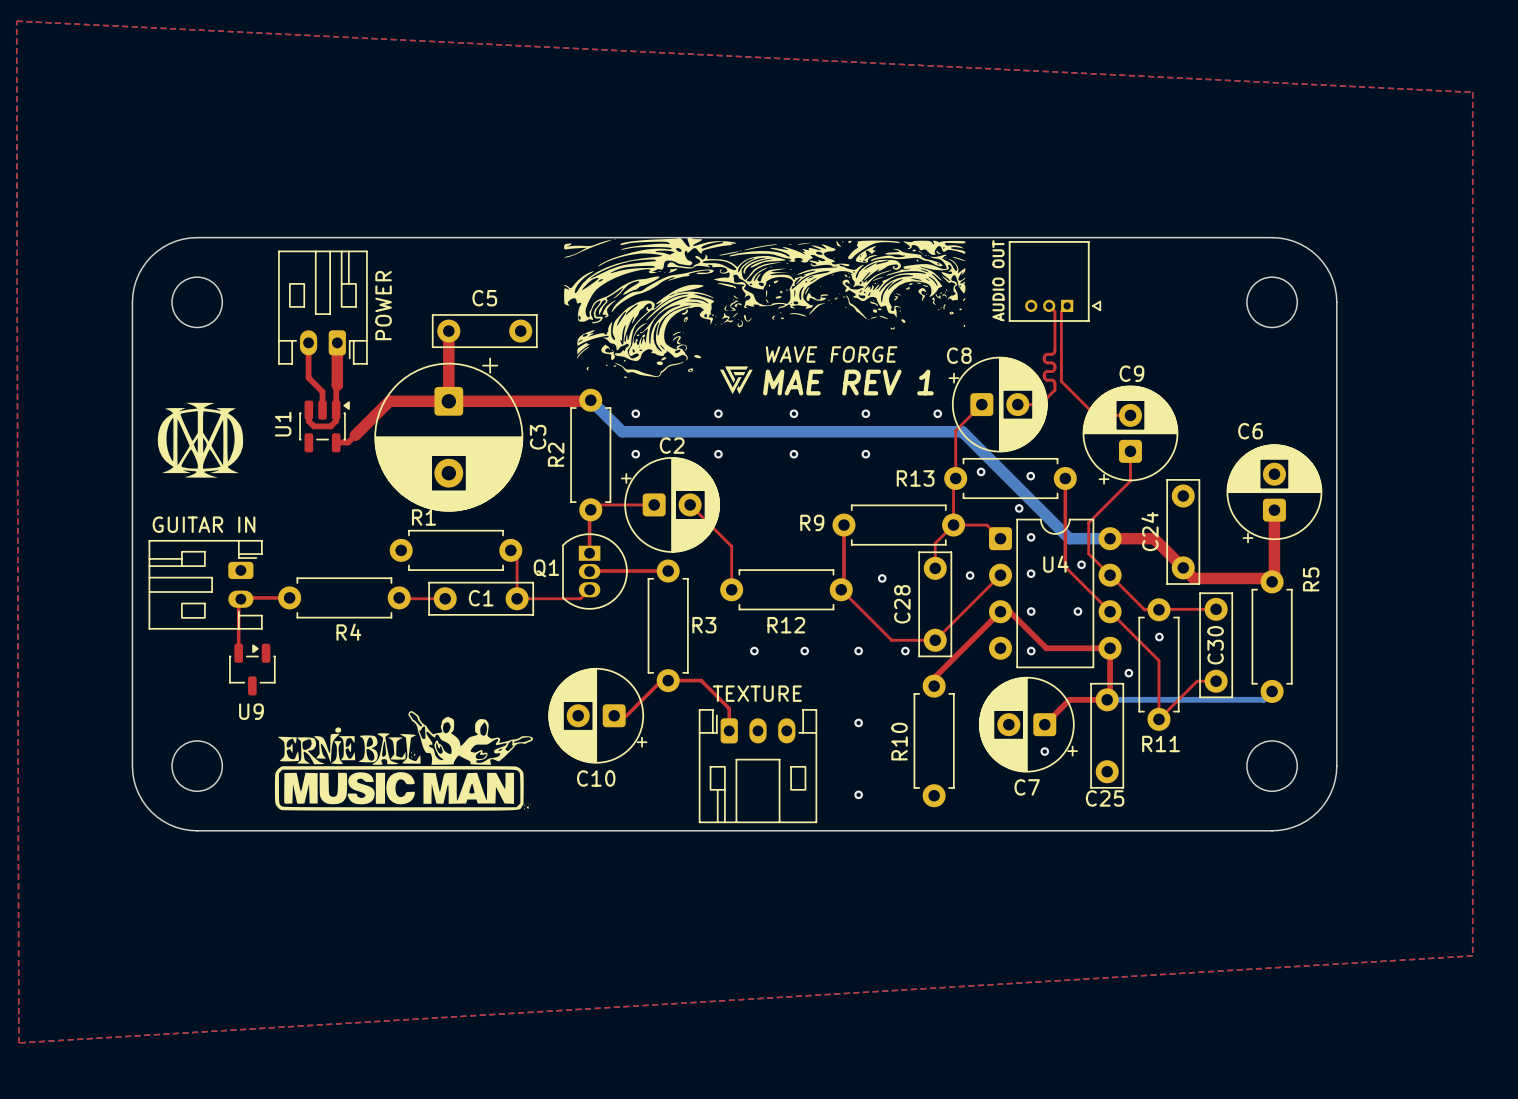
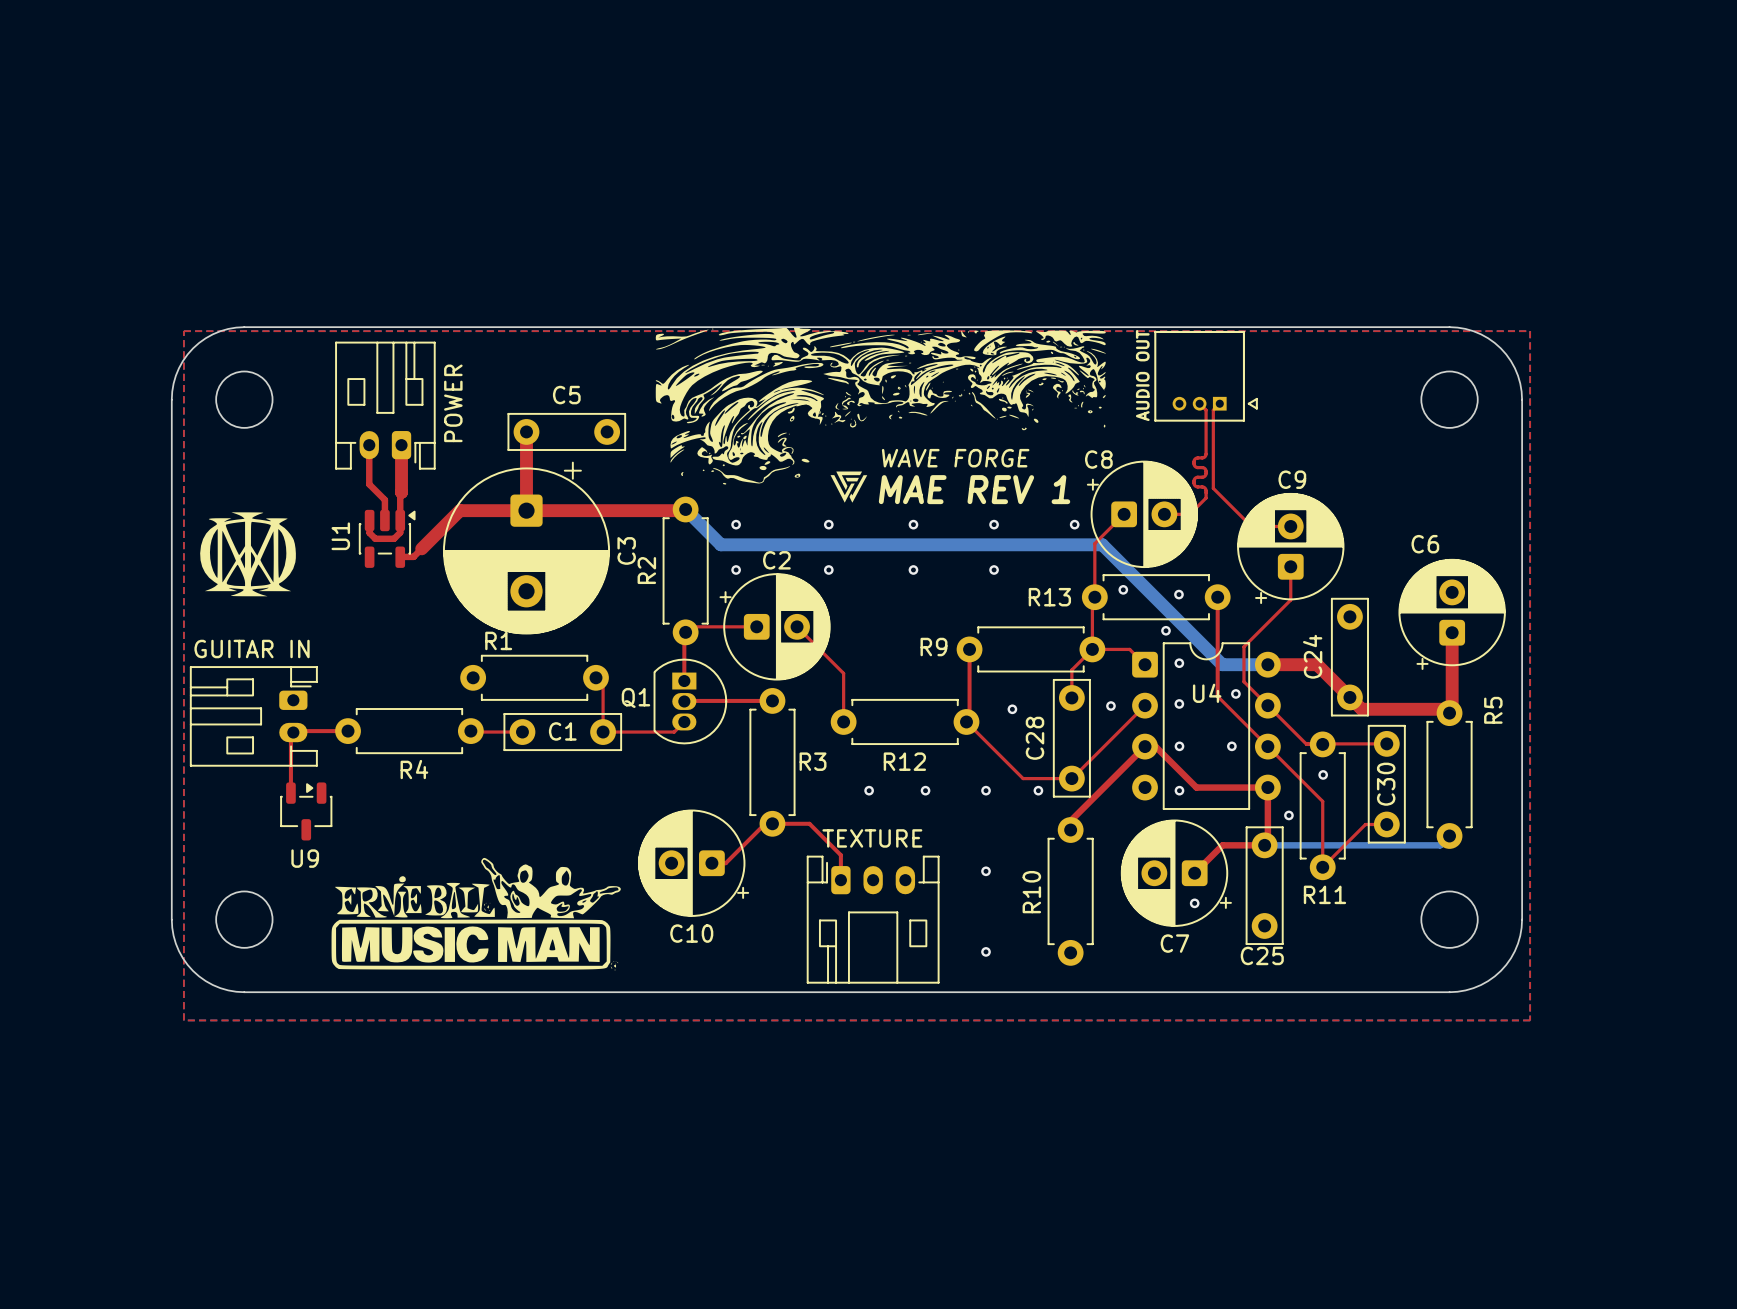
top zone outline: (16, 21) (1472, 92) (1472, 955) (18, 1042) (16, 21) -> none
top zone outline: none -> (183, 331) (1530, 331) (1530, 1020) (183, 1020) (183, 331)

